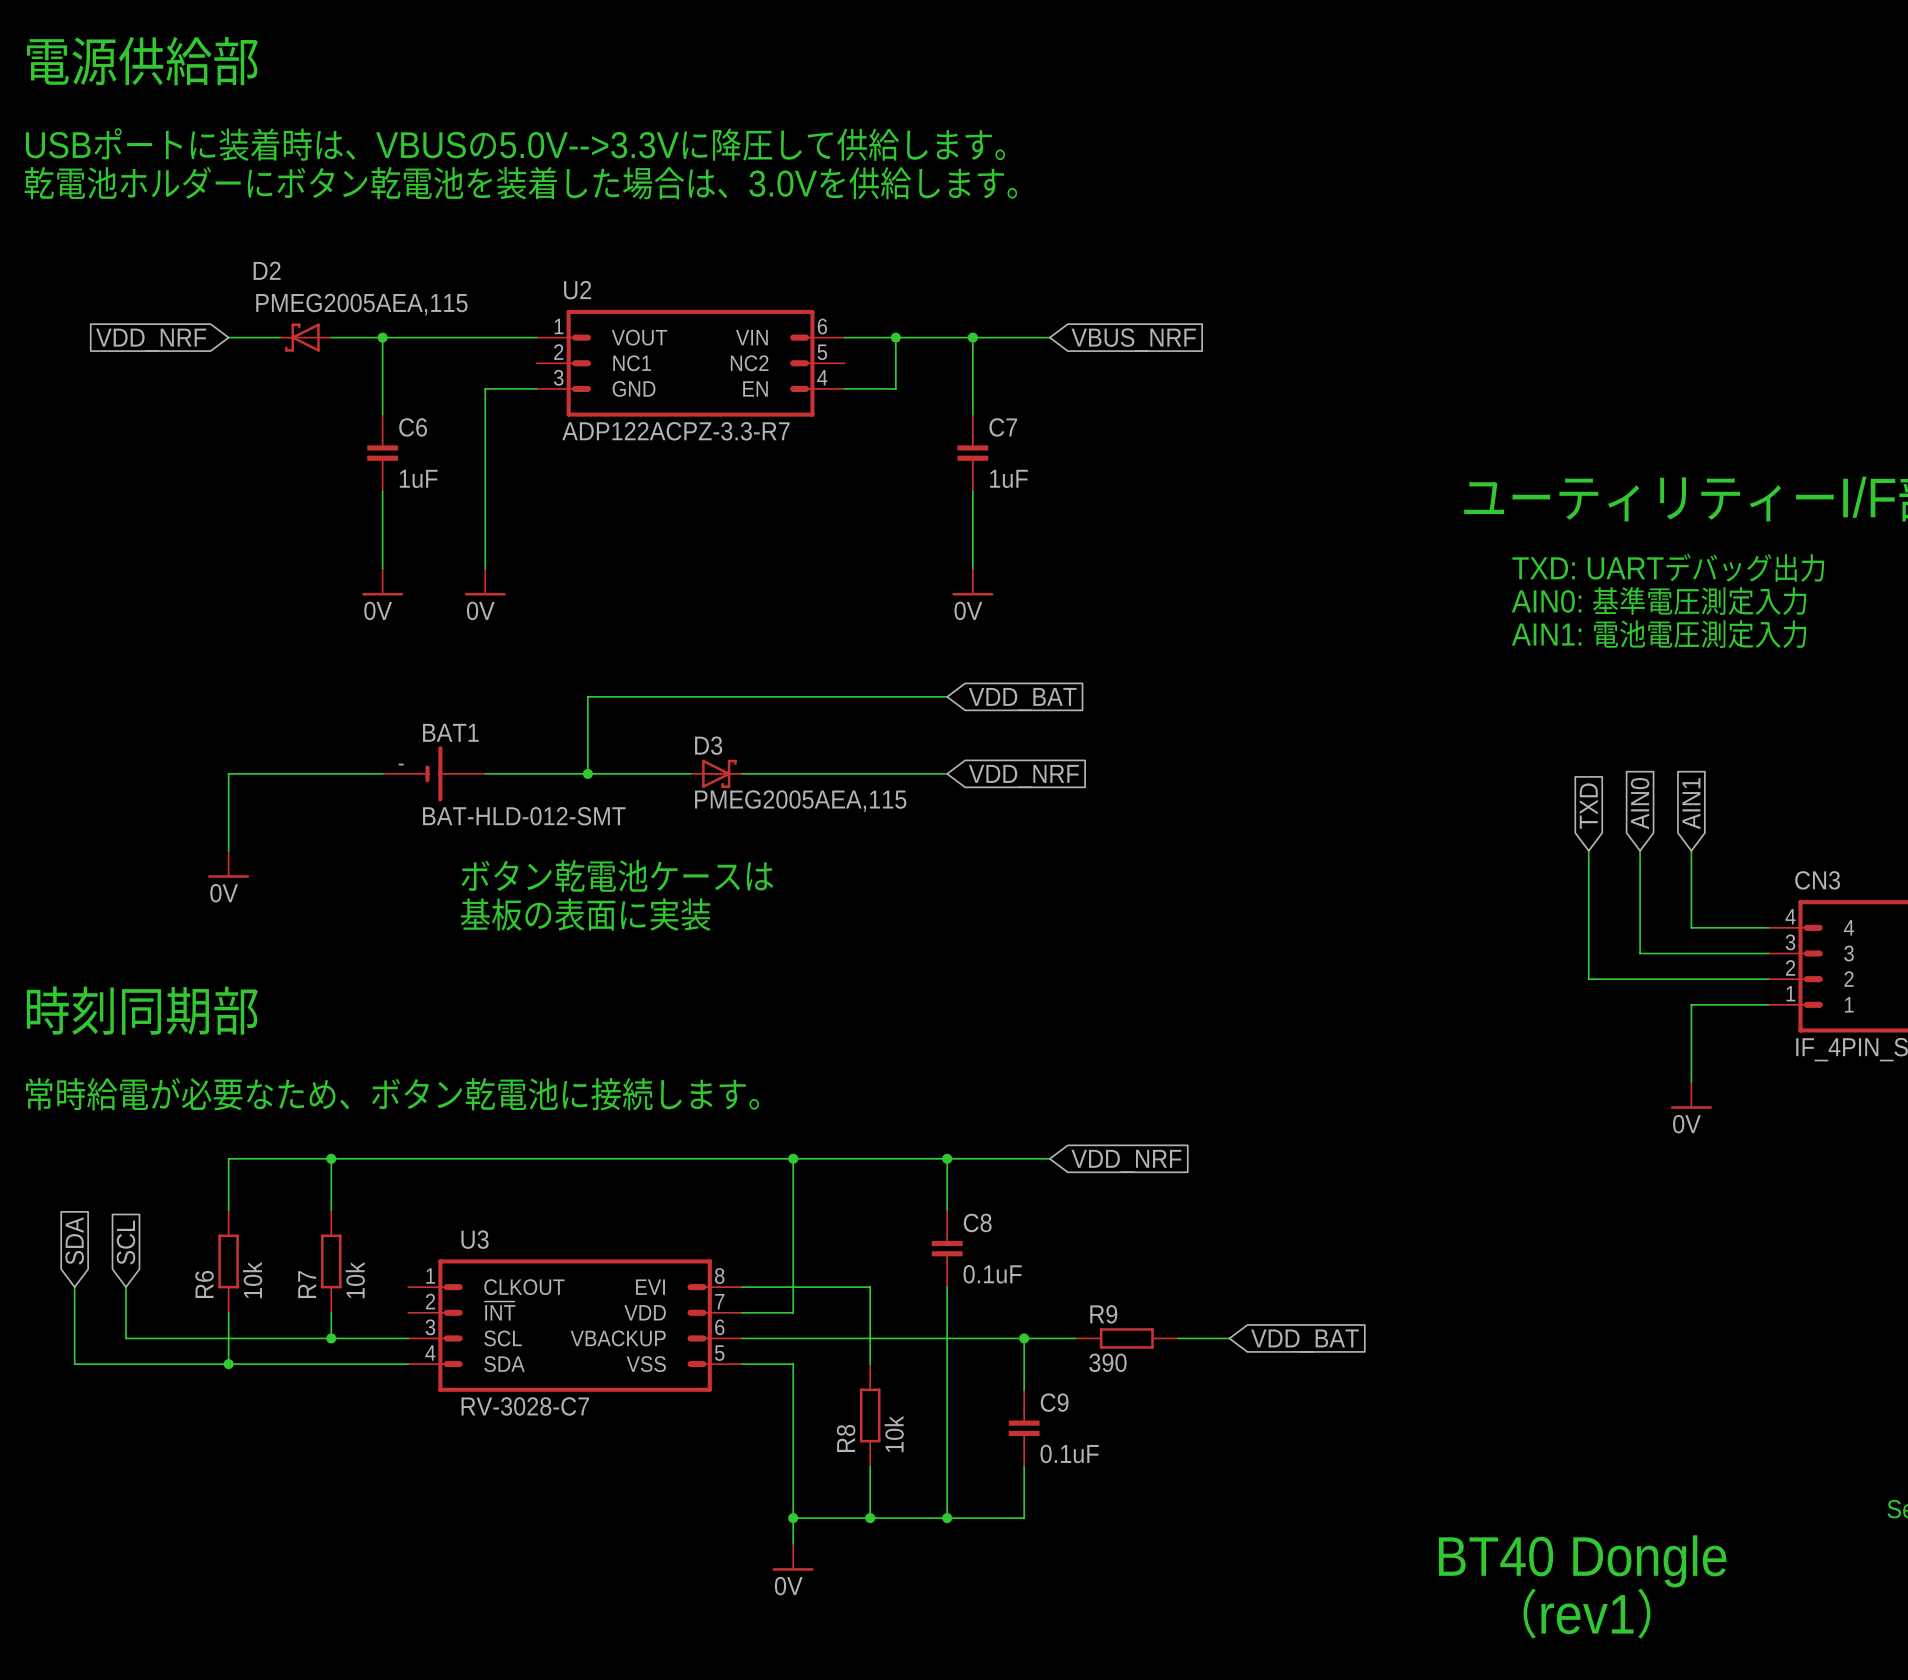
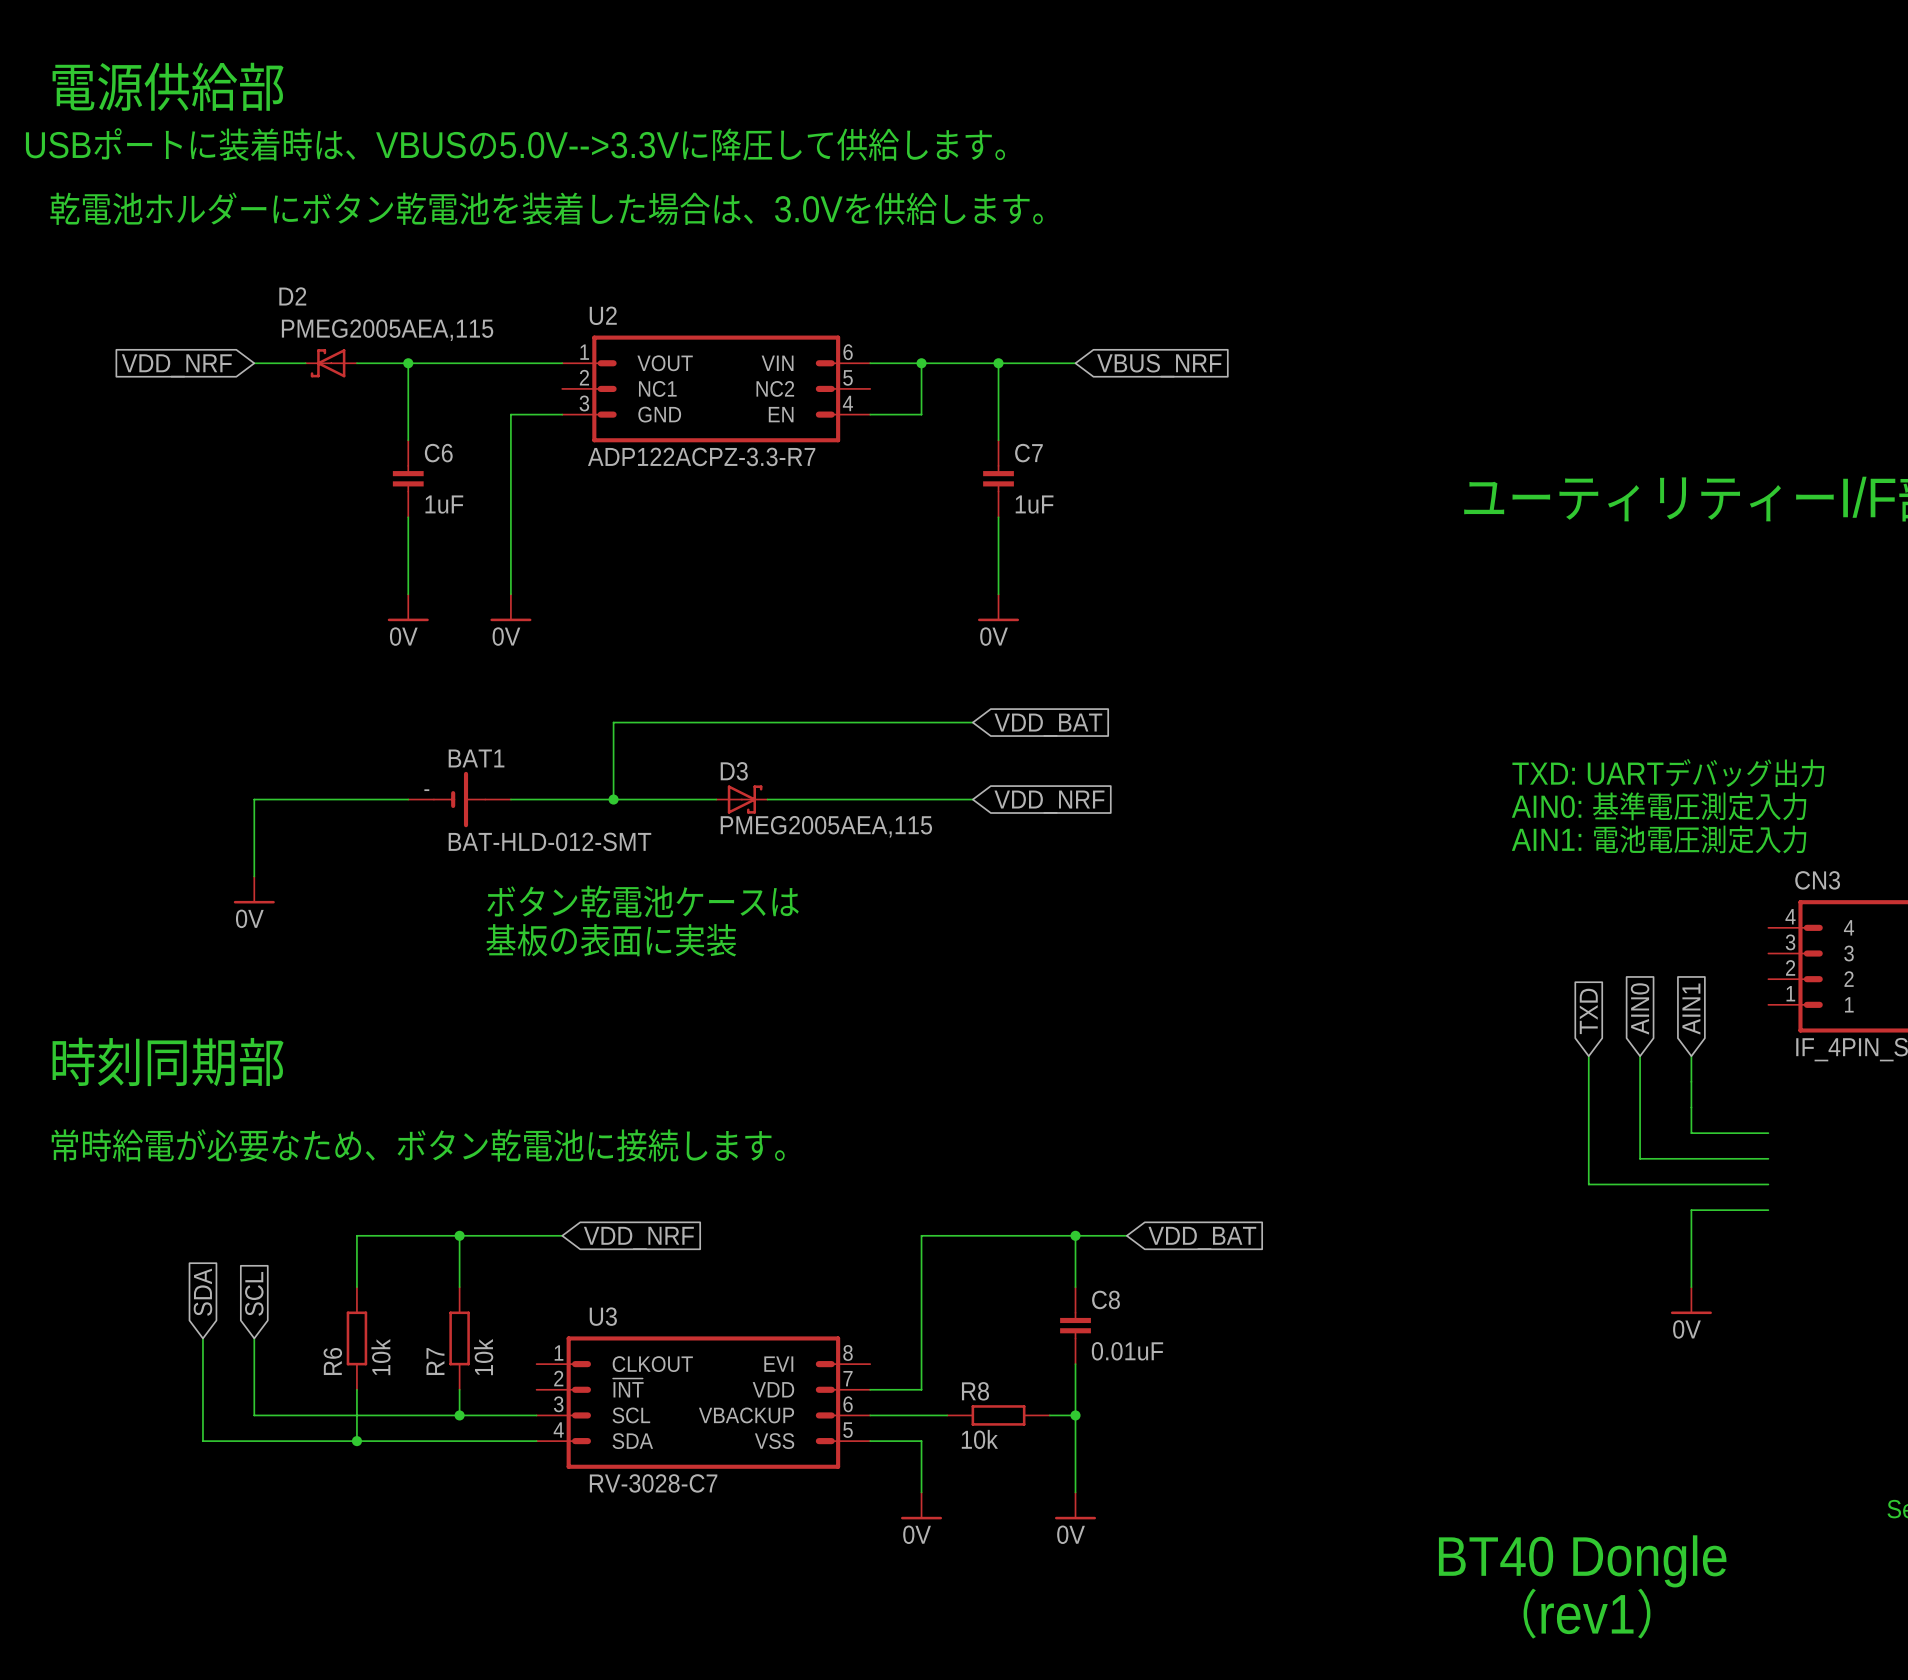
text position: 電源供給部 (142, 61) -> 電源供給部 (168, 86)
text position: 乾電池ホルダーにボタン乾電池を装着した場合は、3.0Vを供給します。 (520, 183) -> 乾電池ホルダーにボタン乾電池を装着した場合は、3.0Vを供給します。 (546, 208)
wire: (228, 337) (279, 337) -> (254, 363) (305, 363)
D2 position: (305, 337) -> (331, 363)
wire: (331, 337) (536, 337) -> (356, 363) (562, 363)
wire: (382, 337) (382, 414) -> (408, 363) (408, 440)
junction position: (382, 337) -> (408, 363)
wire: (844, 337) (1049, 337) -> (870, 363) (1075, 363)
wire: (895, 337) (895, 388) (844, 388) -> (921, 363) (921, 414) (870, 414)
junction: (895, 337) -> none
wire: (972, 337) (972, 414) -> (998, 363) (998, 440)
junction: (972, 337) -> none
global label position: VDD_NRF (151, 340) -> VDD_NRF (176, 365)
global label position: VBUS_NRF (1133, 340) -> VBUS_NRF (1159, 365)
U2 position: (690, 363) -> (716, 388)
junction: none -> (921, 363)
junction: none -> (998, 363)
wire: (536, 388) (485, 388) (485, 568) -> (562, 414) (510, 414) (510, 594)
C6 position: (382, 453) -> (408, 478)
C7 position: (972, 453) -> (998, 478)
wire: (382, 491) (382, 568) -> (408, 517) (408, 594)
wire: (972, 491) (972, 568) -> (998, 517) (998, 594)
text position: TXD: UARTデバッグ出力 (1668, 567) -> TXD: UARTデバッグ出力 (1668, 773)
power symbol position: 0V (382, 582) -> 0V (408, 607)
power symbol position: 0V (485, 582) -> 0V (510, 607)
power symbol position: 0V (972, 582) -> 0V (998, 607)
text position: AIN0: 基準電圧測定入力 (1659, 601) -> AIN0: 基準電圧測定入力 (1659, 806)
text position: AIN1: 電池電圧測定入力 (1659, 634) -> AIN1: 電池電圧測定入力 (1659, 839)
wire: (947, 696) (587, 696) (587, 773) -> (972, 722) (613, 722) (613, 799)
global label position: VDD_BAT (1022, 699) -> VDD_BAT (1048, 725)
wire: (382, 773) (228, 773) (228, 850) -> (408, 799) (254, 799) (254, 876)
BAT1 position: (433, 773) -> (459, 799)
wire: (485, 773) (690, 773) -> (510, 799) (716, 799)
junction position: (587, 773) -> (613, 799)
D3 position: (716, 773) -> (741, 799)
wire: (741, 773) (947, 773) -> (767, 799) (972, 799)
global label position: VDD_NRF (1023, 776) -> VDD_NRF (1049, 802)
global label position: AIN0 (1640, 803) -> AIN0 (1640, 1008)
global label position: AIN1 (1691, 803) -> AIN1 (1691, 1009)
global label position: TXD (1588, 806) -> TXD (1588, 1011)
wire: (1588, 850) (1588, 979) (1768, 979) -> (1588, 1056) (1588, 1184) (1768, 1184)
wire: (1640, 850) (1640, 953) (1768, 953) -> (1640, 1056) (1640, 1158) (1768, 1158)
wire: (1691, 850) (1691, 927) (1768, 927) -> none
power symbol position: 0V (228, 864) -> 0V (254, 890)
text position: ボタン乾電池ケースは (617, 876) -> ボタン乾電池ケースは (642, 901)
text position: 基板の表面に実装 (585, 914) -> 基板の表面に実装 (611, 940)
wire: (1768, 1004) (1691, 1004) (1691, 1056) -> none
text position: 時刻同期部 (142, 1010) -> 時刻同期部 (168, 1061)
wire: none -> (1691, 1081) (1691, 1133) (1768, 1133)
text position: 常時給電が必要なため、ボタン乾電池に接続します。 (392, 1094) -> 常時給電が必要なため、ボタン乾電池に接続します。 (418, 1145)
power symbol position: 0V (1691, 1095) -> 0V (1691, 1300)
wire: (331, 1158) (331, 1210) -> (459, 1235) (459, 1287)
junction: (331, 1158) -> none
wire: (793, 1158) (793, 1312) (741, 1312) -> none
junction: (793, 1158) -> none
wire: (947, 1158) (947, 1210) -> (1075, 1235) (1075, 1287)
junction: (947, 1158) -> none
wire: (1049, 1158) (228, 1158) (228, 1210) -> none
global label: VDD_NRF (1126, 1161) -> none
wire: none -> (1768, 1210) (1691, 1210) (1691, 1287)
junction: none -> (459, 1235)
wire: none -> (562, 1235) (356, 1235) (356, 1287)
junction: none -> (1075, 1235)
wire: none -> (1126, 1235) (921, 1235) (921, 1389) (870, 1389)
global label: none -> VDD_NRF (638, 1238)
global label position: SDA (74, 1240) -> SDA (202, 1292)
global label position: SCL (125, 1242) -> SCL (254, 1293)
C8 position: (947, 1248) -> (1075, 1325)
R6 position: (228, 1261) -> (356, 1338)
R7 position: (331, 1261) -> (459, 1338)
C8 value: 0.1uF (992, 1274) -> 0.01uF (1127, 1351)
wire: (74, 1287) (74, 1364) (408, 1364) -> none
wire: (125, 1287) (125, 1338) (408, 1338) -> none
wire: (741, 1287) (870, 1287) (870, 1364) -> none
wire: (947, 1287) (947, 1518) -> none
wire: (228, 1312) (228, 1364) -> (356, 1389) (356, 1441)
wire: (331, 1312) (331, 1338) -> (459, 1389) (459, 1415)
U3 position: (575, 1325) -> (703, 1402)
wire: none -> (202, 1338) (202, 1441) (536, 1441)
wire: none -> (254, 1338) (254, 1415) (536, 1415)
junction: (331, 1338) -> none
wire: (741, 1338) (1075, 1338) -> none
wire: (1024, 1338) (1024, 1389) -> none
junction: (1024, 1338) -> none
R9: 390 (1126, 1338) -> none
wire: (1178, 1338) (1229, 1338) -> none
global label position: VDD_BAT (1305, 1341) -> VDD_BAT (1202, 1238)
junction: (228, 1364) -> none
wire: (741, 1364) (793, 1364) (793, 1543) -> none
wire: none -> (1075, 1364) (1075, 1492)
junction: none -> (459, 1415)
wire: none -> (870, 1415) (947, 1415)
R8 rotation: 0° (870, 1415) -> 90° clockwise (998, 1415)
R8 position: (870, 1415) -> (998, 1415)
wire: none -> (1049, 1415) (1075, 1415)
junction: none -> (1075, 1415)
C9: 0.1uF (1024, 1428) -> none
junction: none -> (356, 1441)
wire: none -> (870, 1441) (921, 1441) (921, 1492)
wire: (870, 1466) (870, 1518) -> none
wire: (1024, 1466) (1024, 1518) (793, 1518) -> none
power symbol: none -> 0V (1075, 1505)
junction: (793, 1518) -> none
junction: (870, 1518) -> none
junction: (947, 1518) -> none
power symbol position: 0V (793, 1557) -> 0V (921, 1505)

